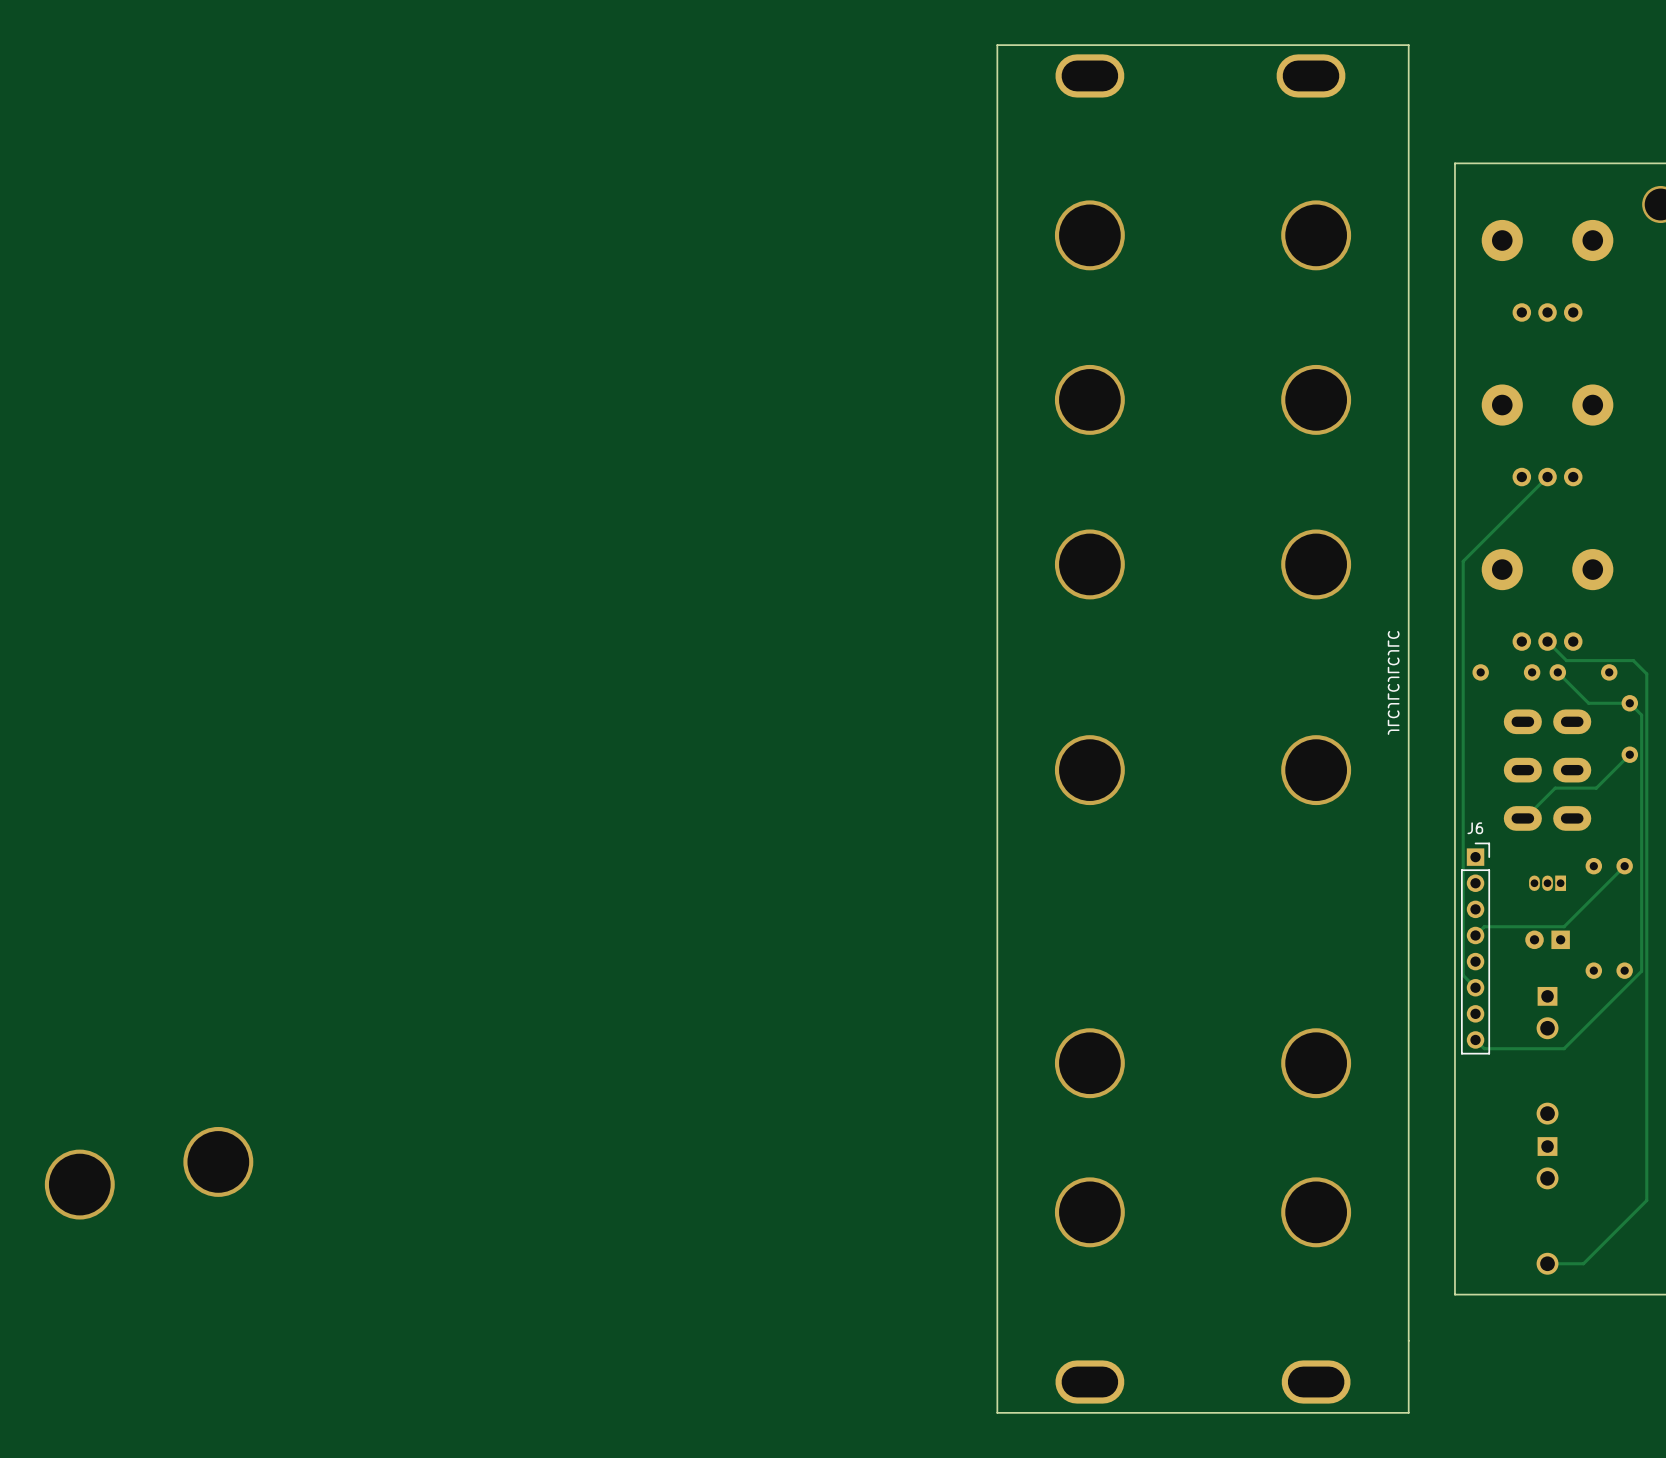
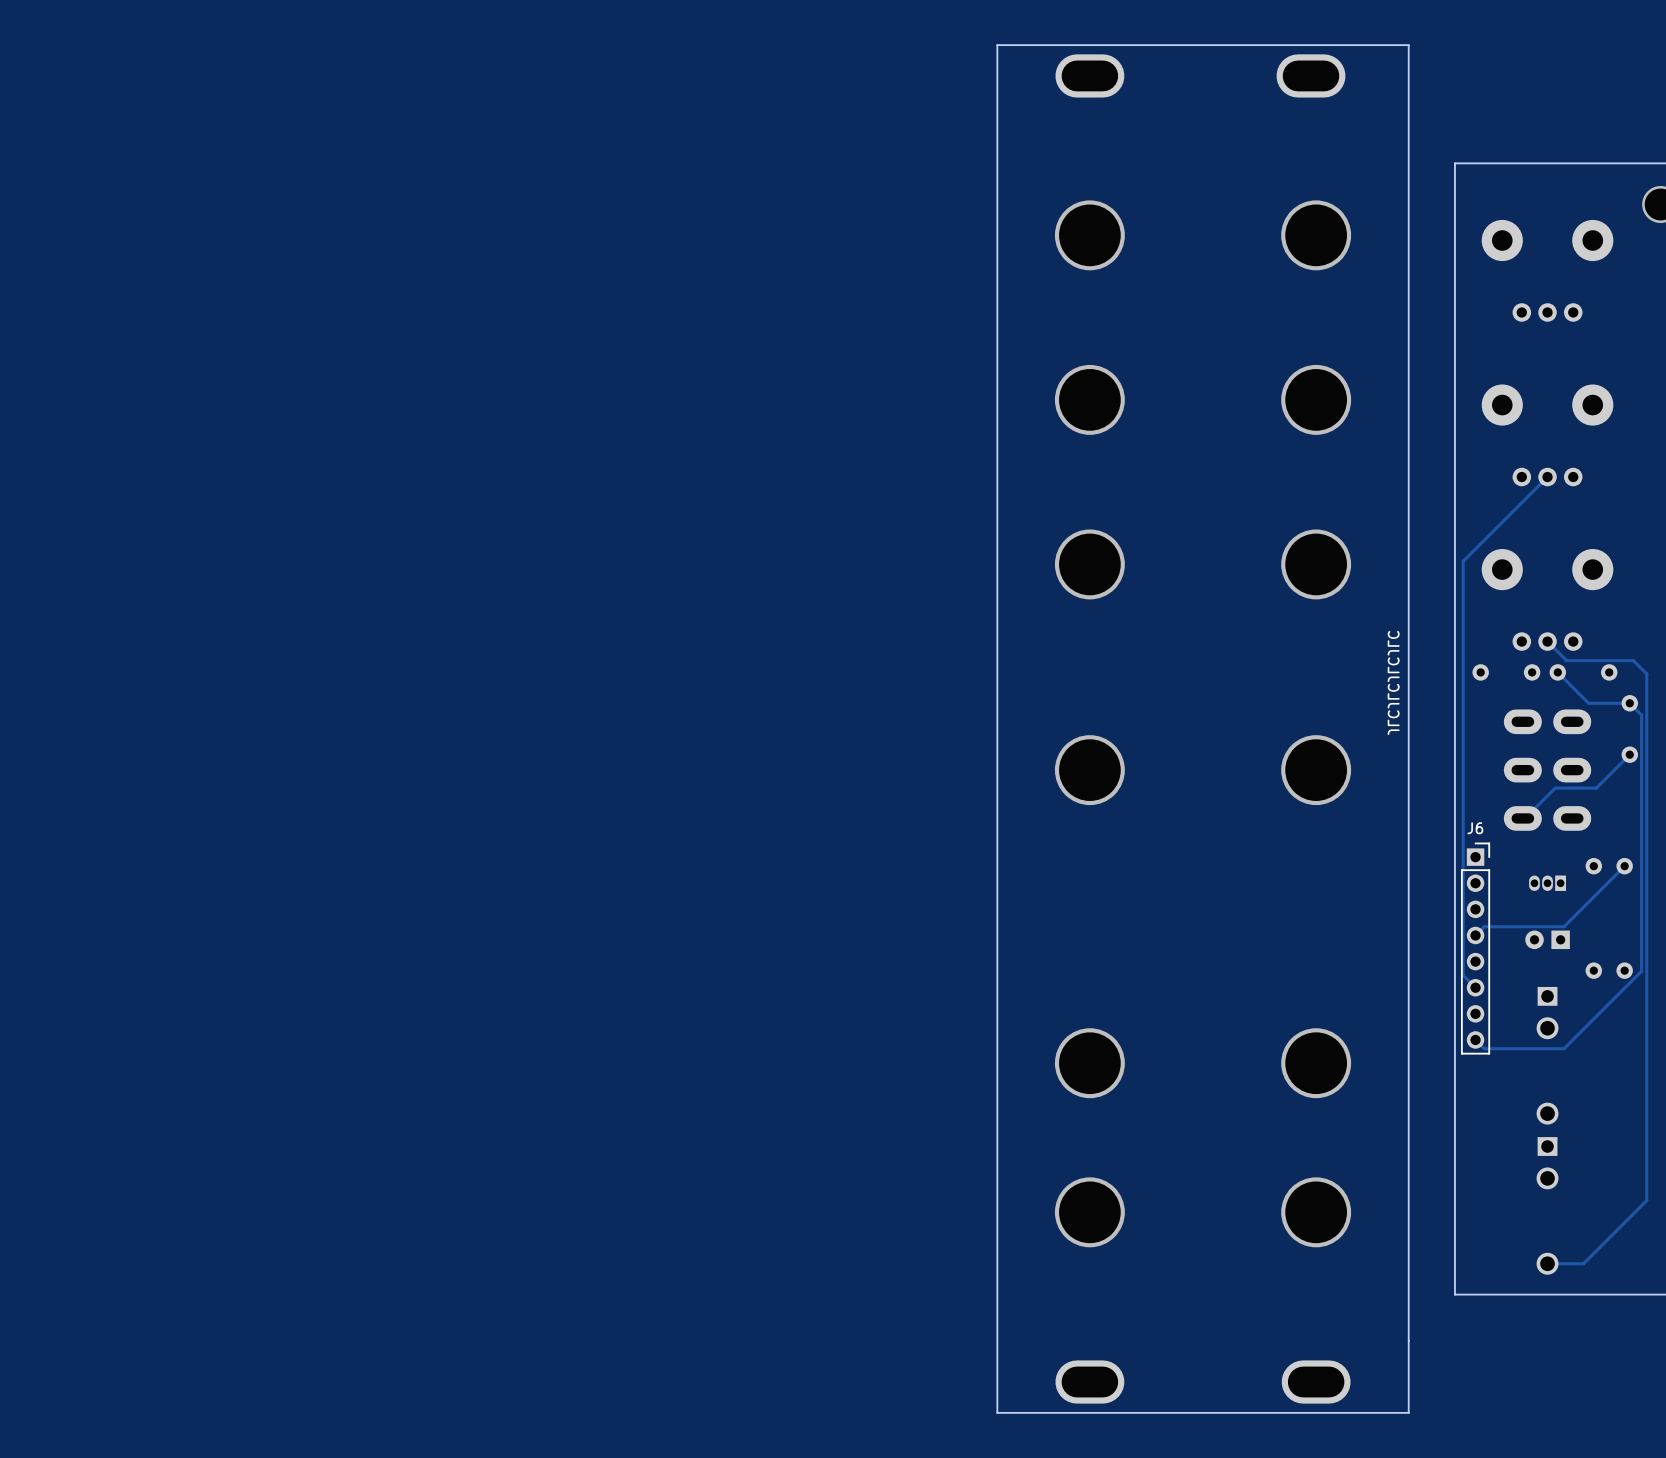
via: (218, 1161) -> none
via: (79, 1184) -> none

